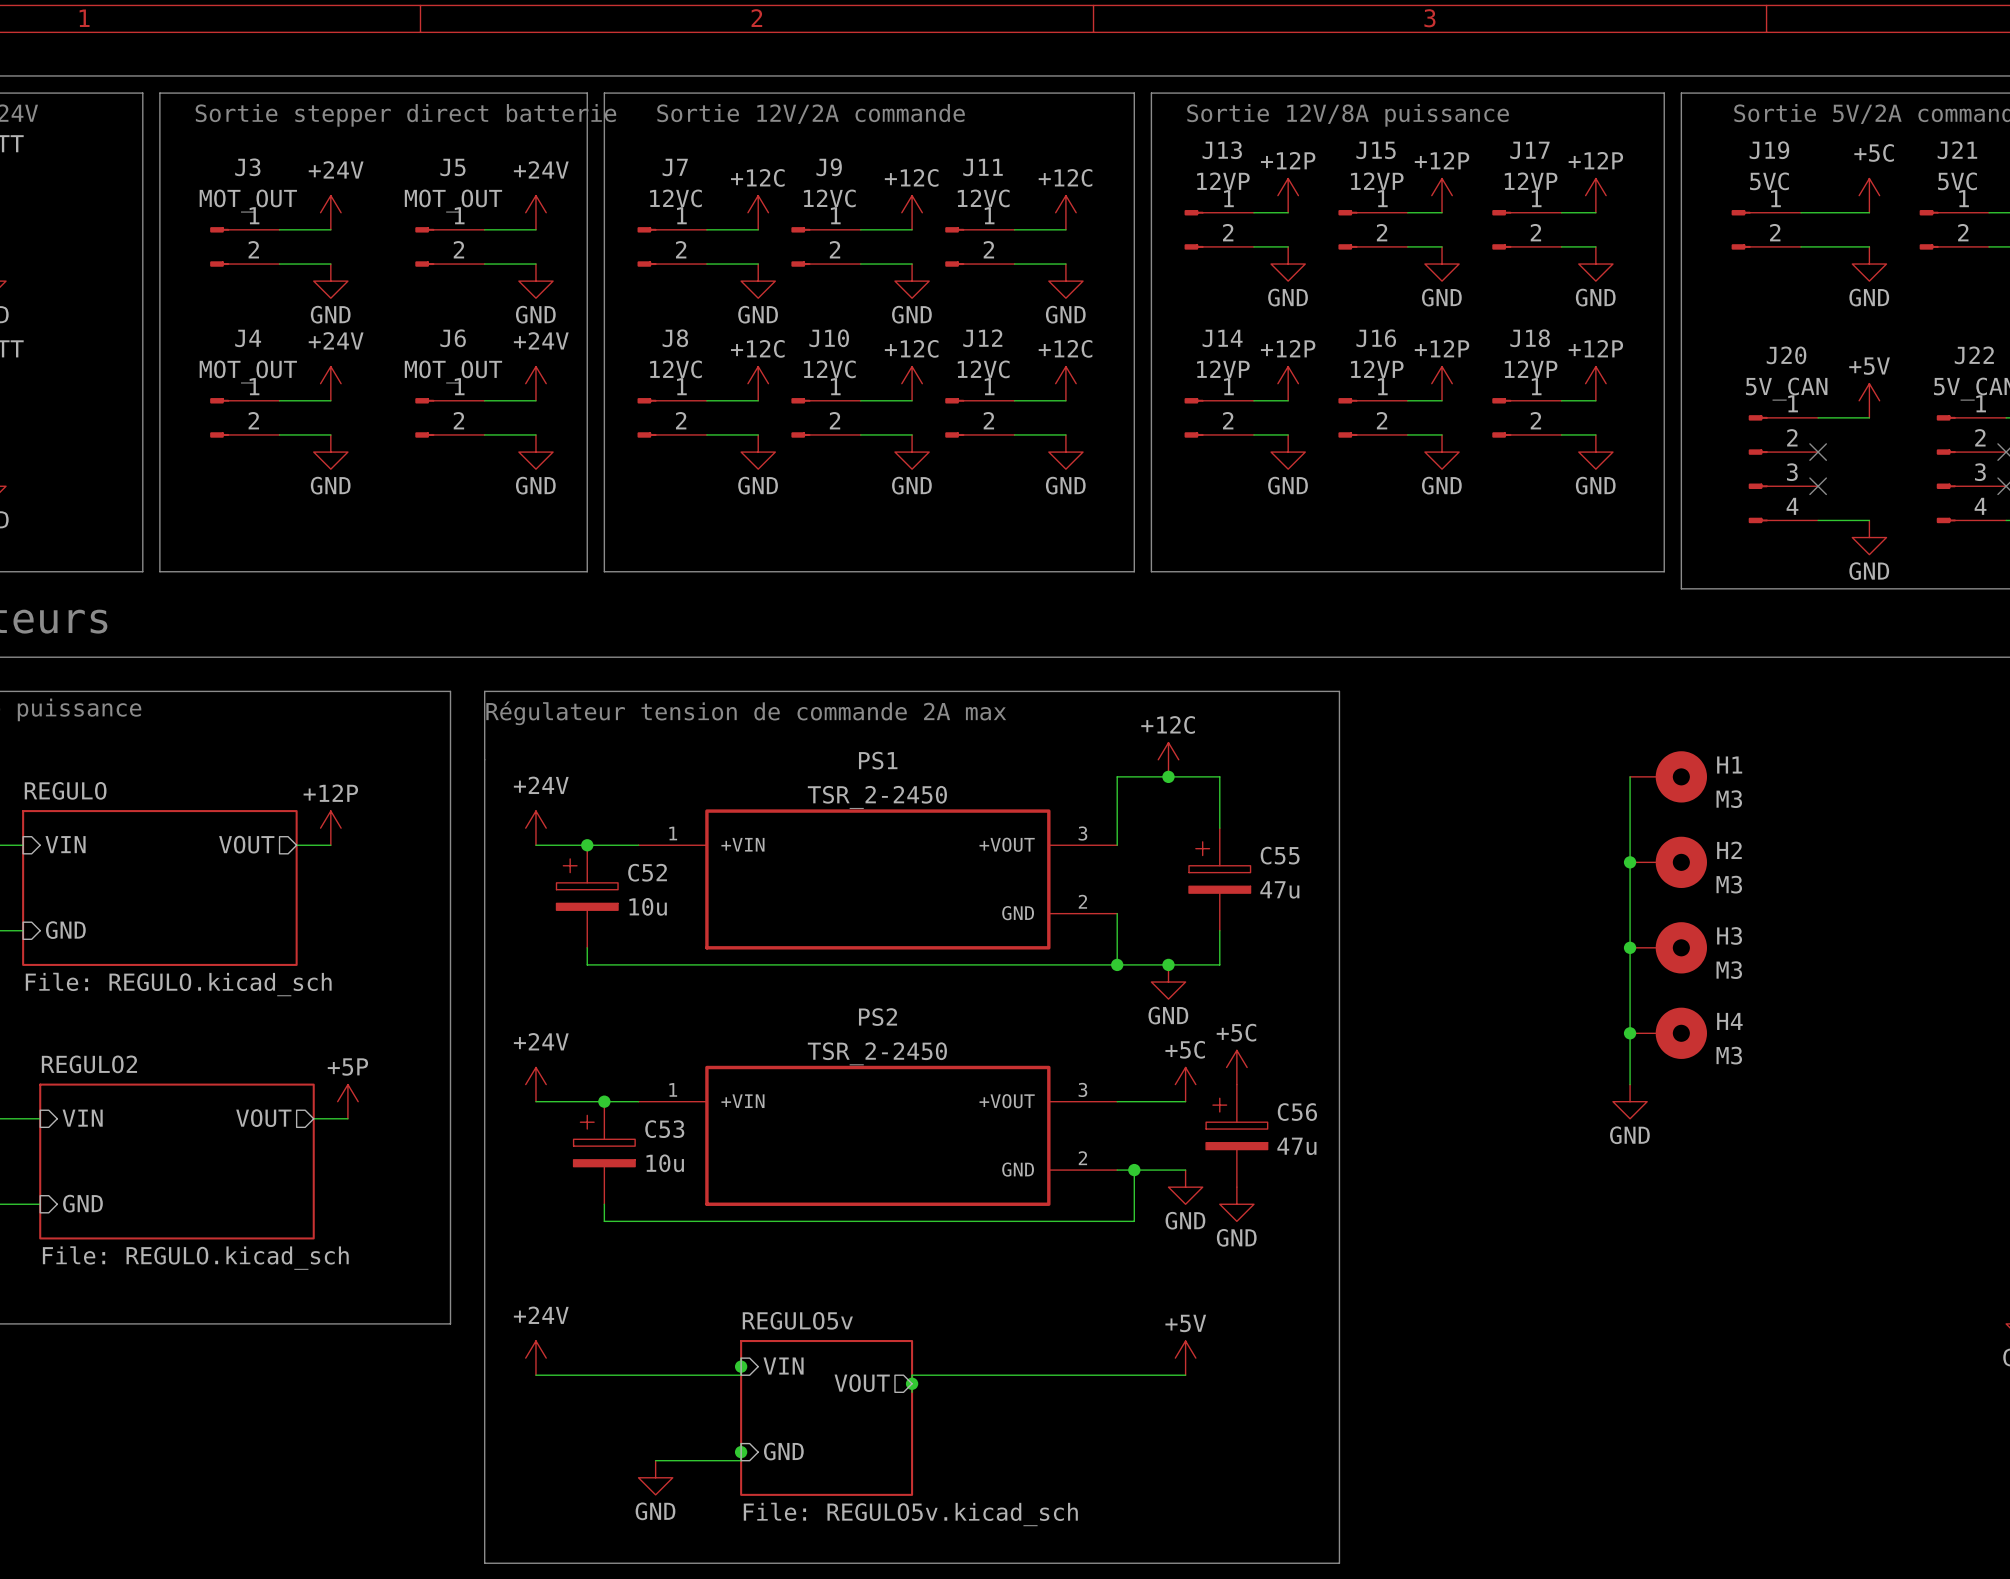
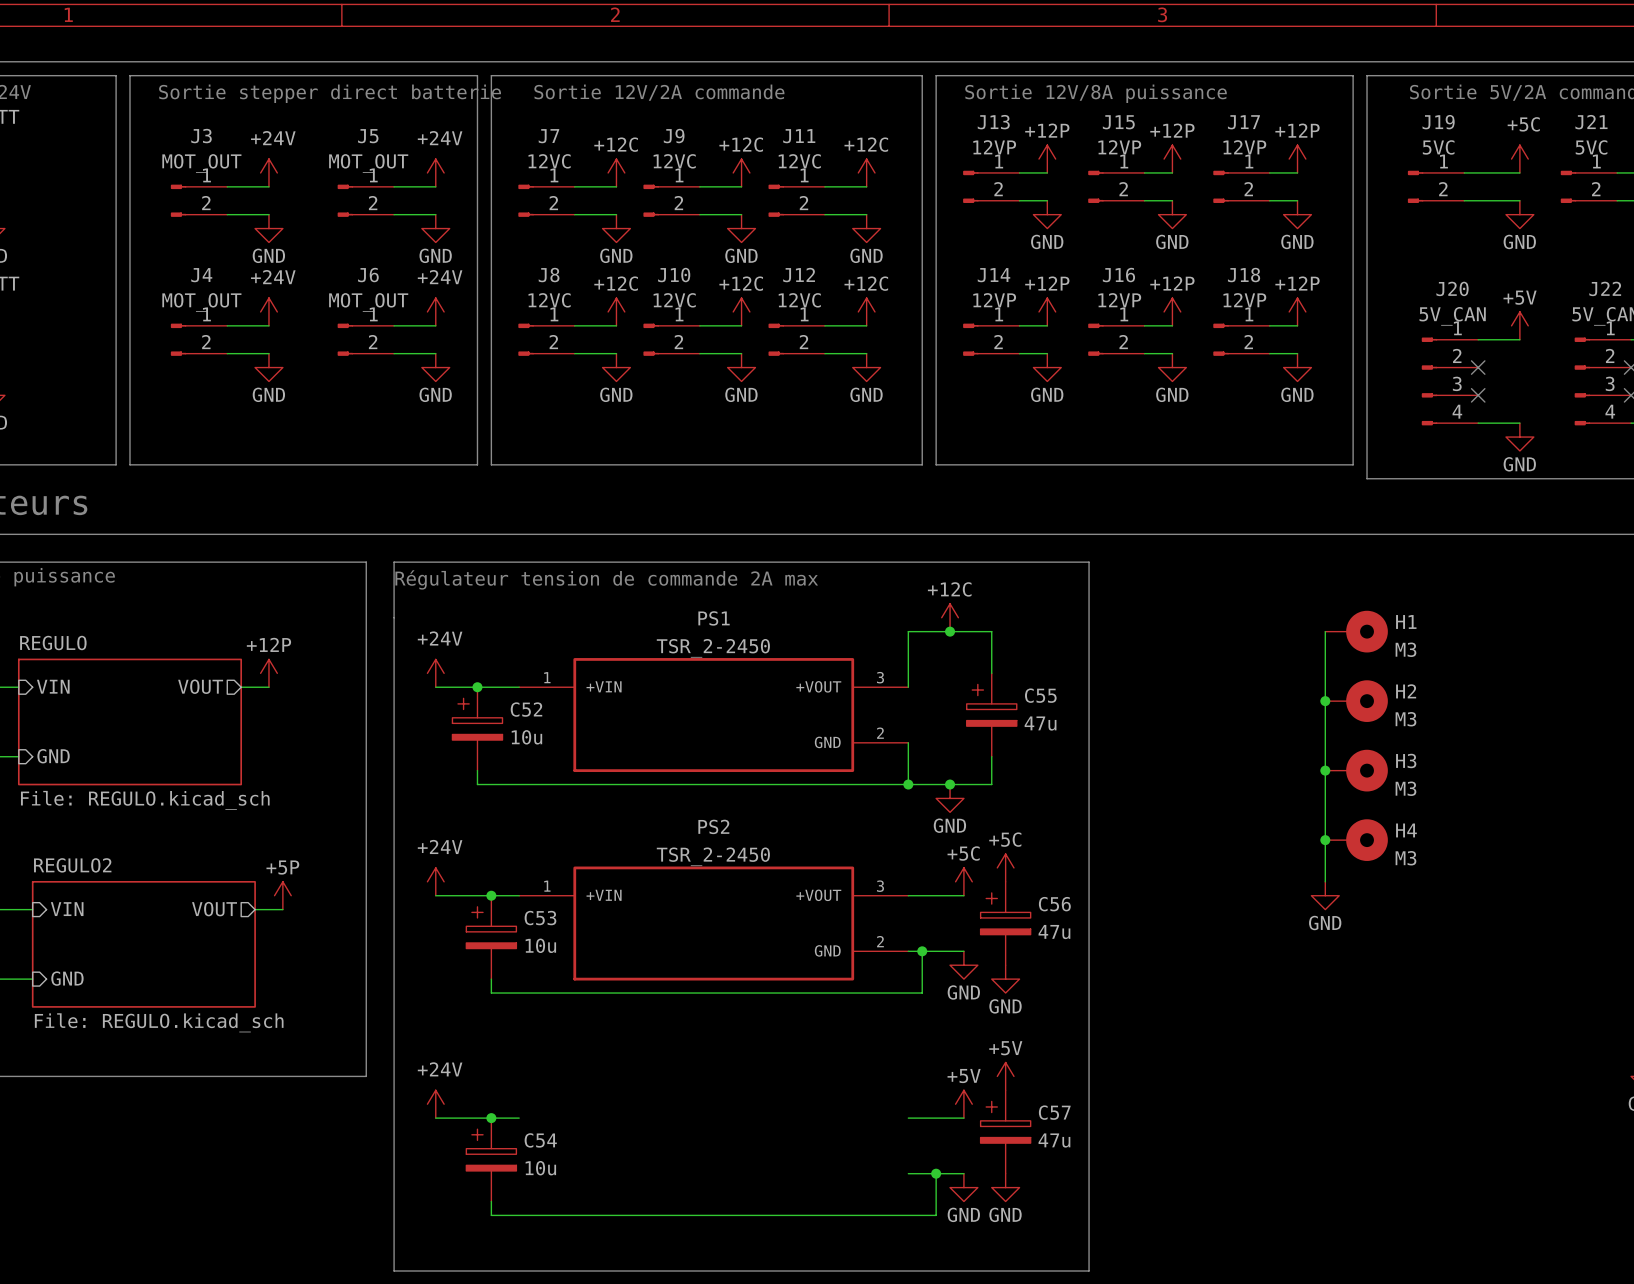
power symbol: none -> +5V (1005, 1076)
wire: (741, 1358) (741, 1375) (638, 1375) -> none
junction: (741, 1366) -> none
sheet pin: VIN (783, 1366) -> none
junction: none -> (491, 1118)
wire: (1117, 1375) (912, 1375) (912, 1392) -> none
sheet pin: VOUT (862, 1383) -> none
junction: (912, 1383) -> none
C57: none -> 47u (1005, 1132)
sheet REGULO5v: File: REGULO5v.kicad_sch (826, 1417) -> none
C54: none -> 10u (491, 1159)
wire: (741, 1443) (741, 1460) (655, 1460) -> none
wire: none -> (908, 1173) (963, 1173)
wire: none -> (936, 1173) (936, 1215) (491, 1215) (491, 1201)
junction: none -> (936, 1173)
sheet pin: GND (783, 1451) -> none
junction: (741, 1452) -> none
power symbol: none -> GND (963, 1187)
power symbol: none -> GND (1005, 1187)
power symbol: GND (655, 1477) -> none

